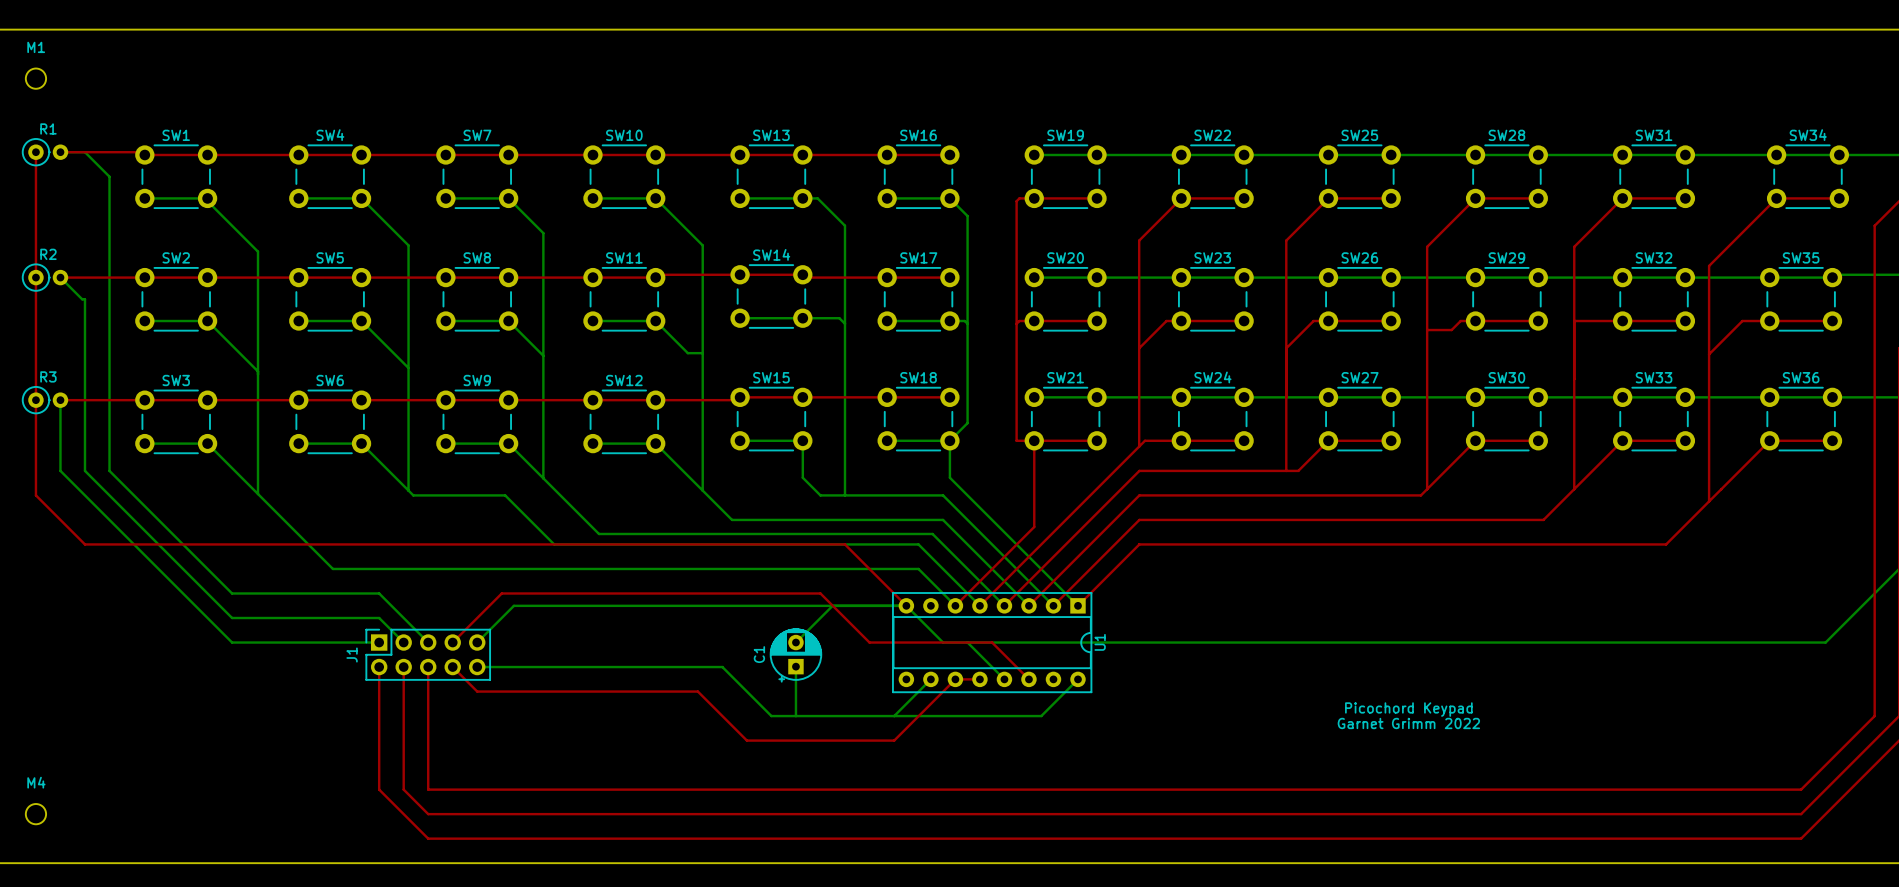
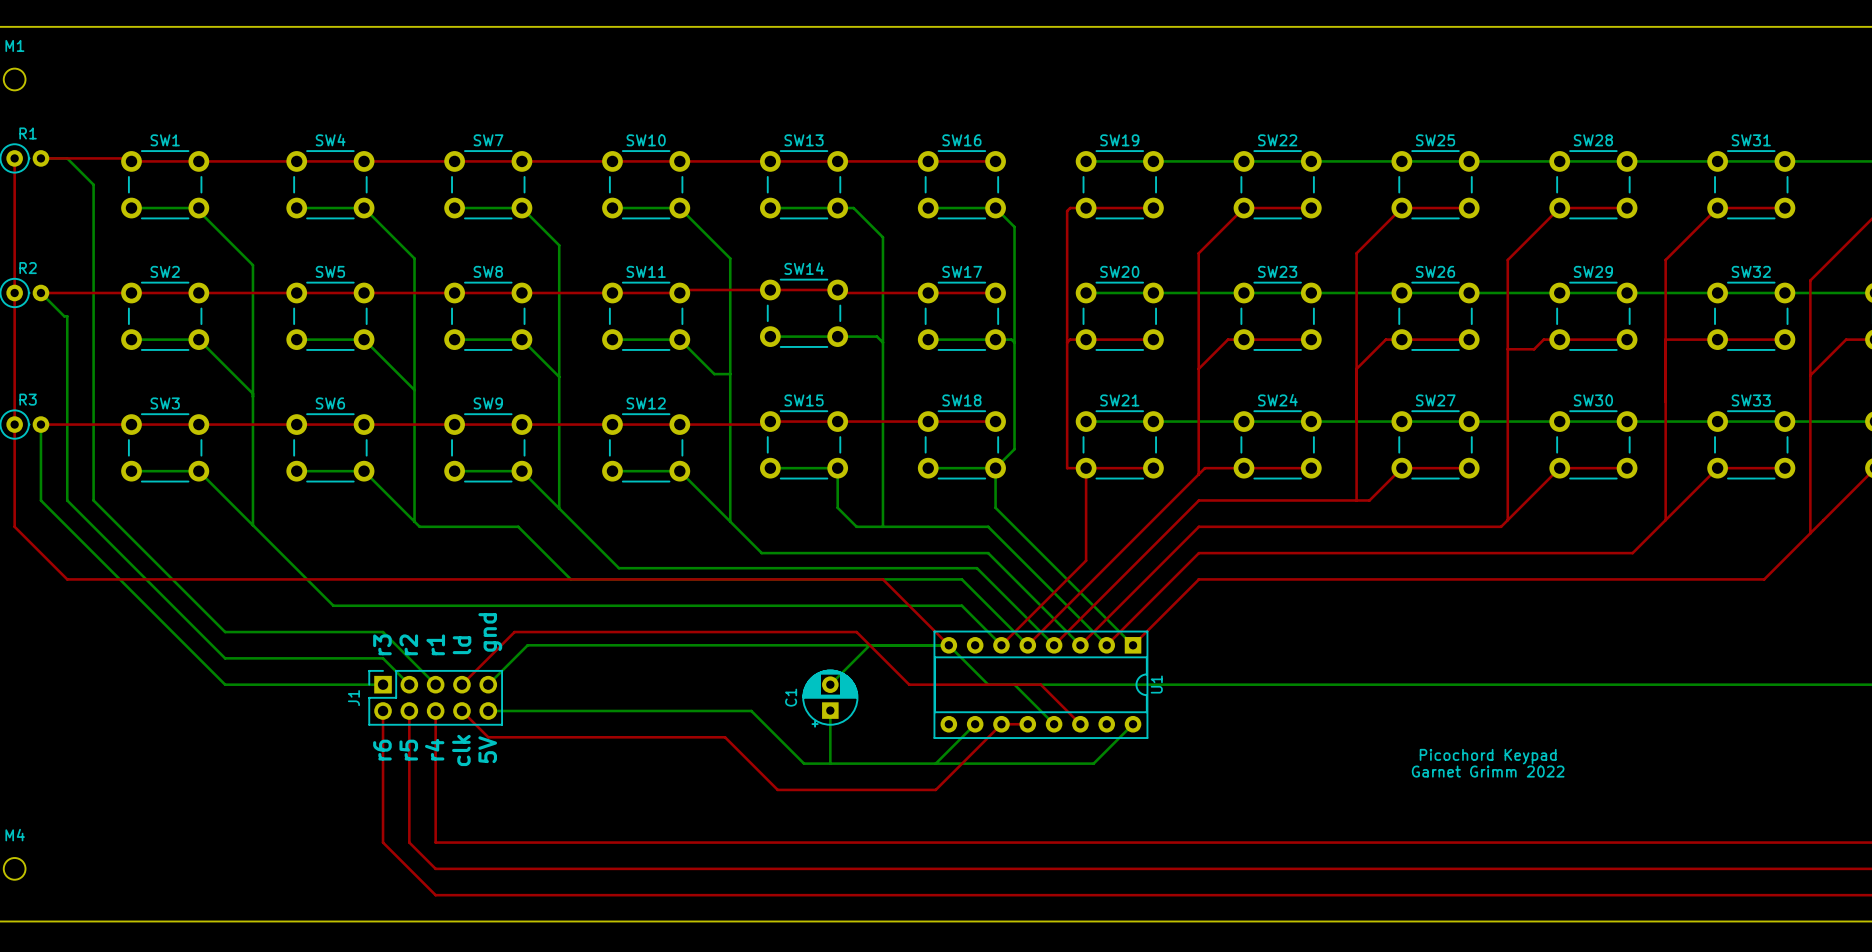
text: none -> gnd (490, 632)
text: none -> r3 (382, 644)
text: none -> r2 (408, 644)
text: none -> r1 (435, 644)
text: none -> ld (462, 645)
text: none -> r6 (382, 750)
text: none -> r5 (408, 750)
text: none -> r4 (434, 749)
text: none -> clk (461, 750)
text: none -> 5V (487, 749)

